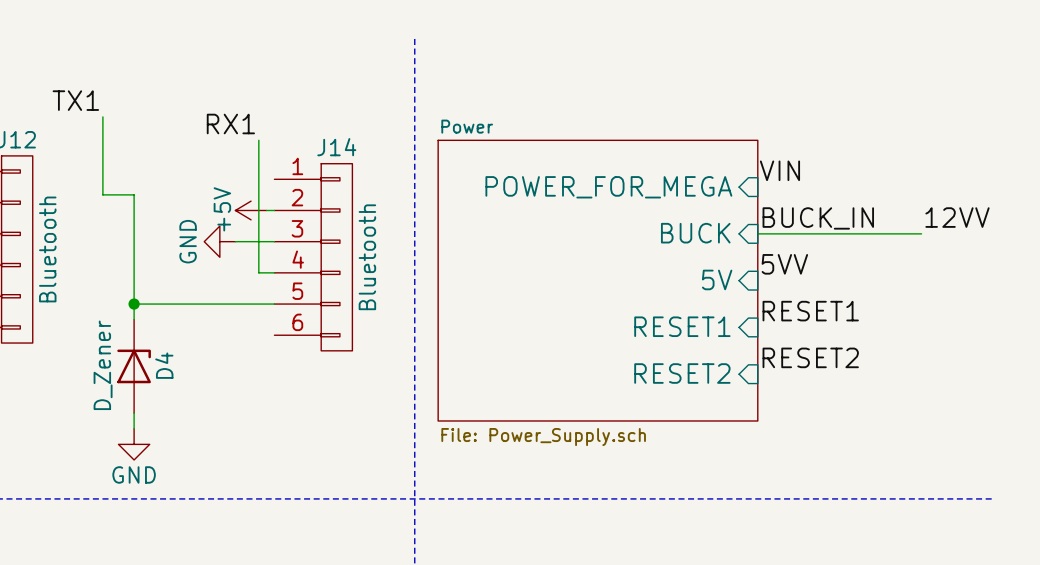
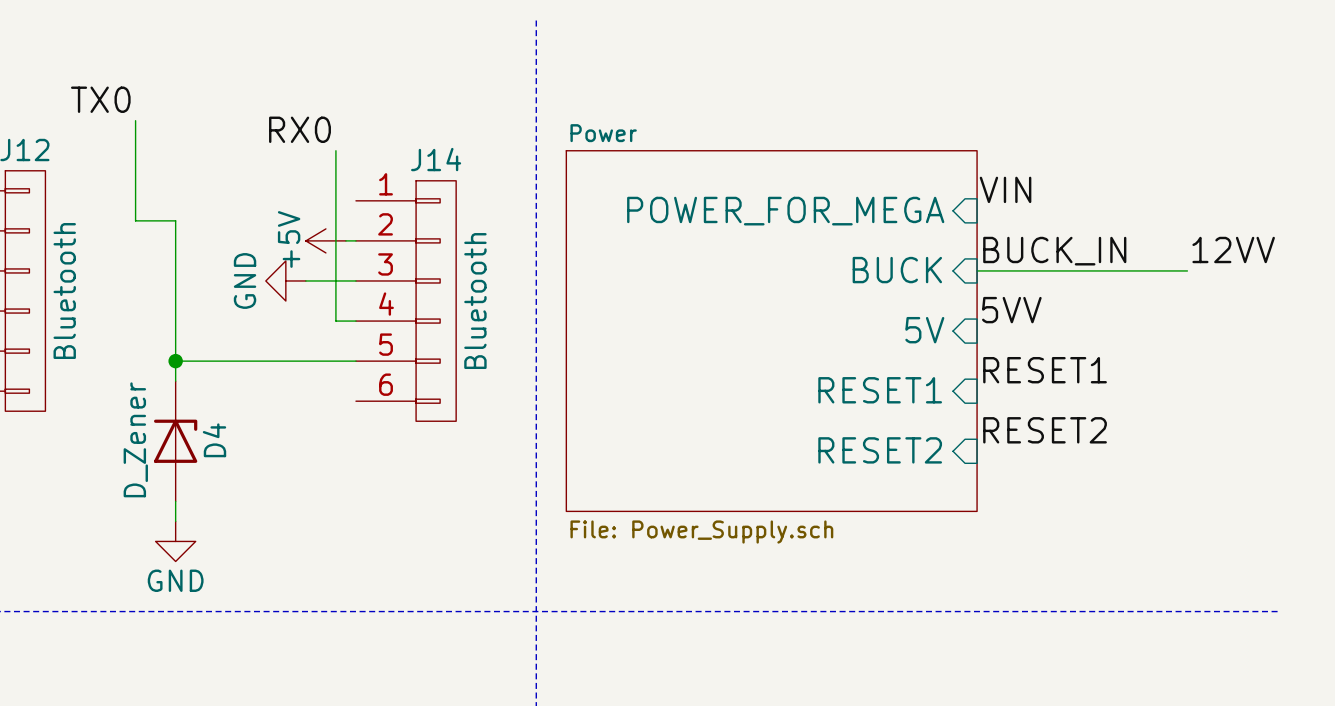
label: TX1 (75, 100) -> TX0 (100, 99)
label: RX1 (230, 124) -> RX0 (300, 129)

